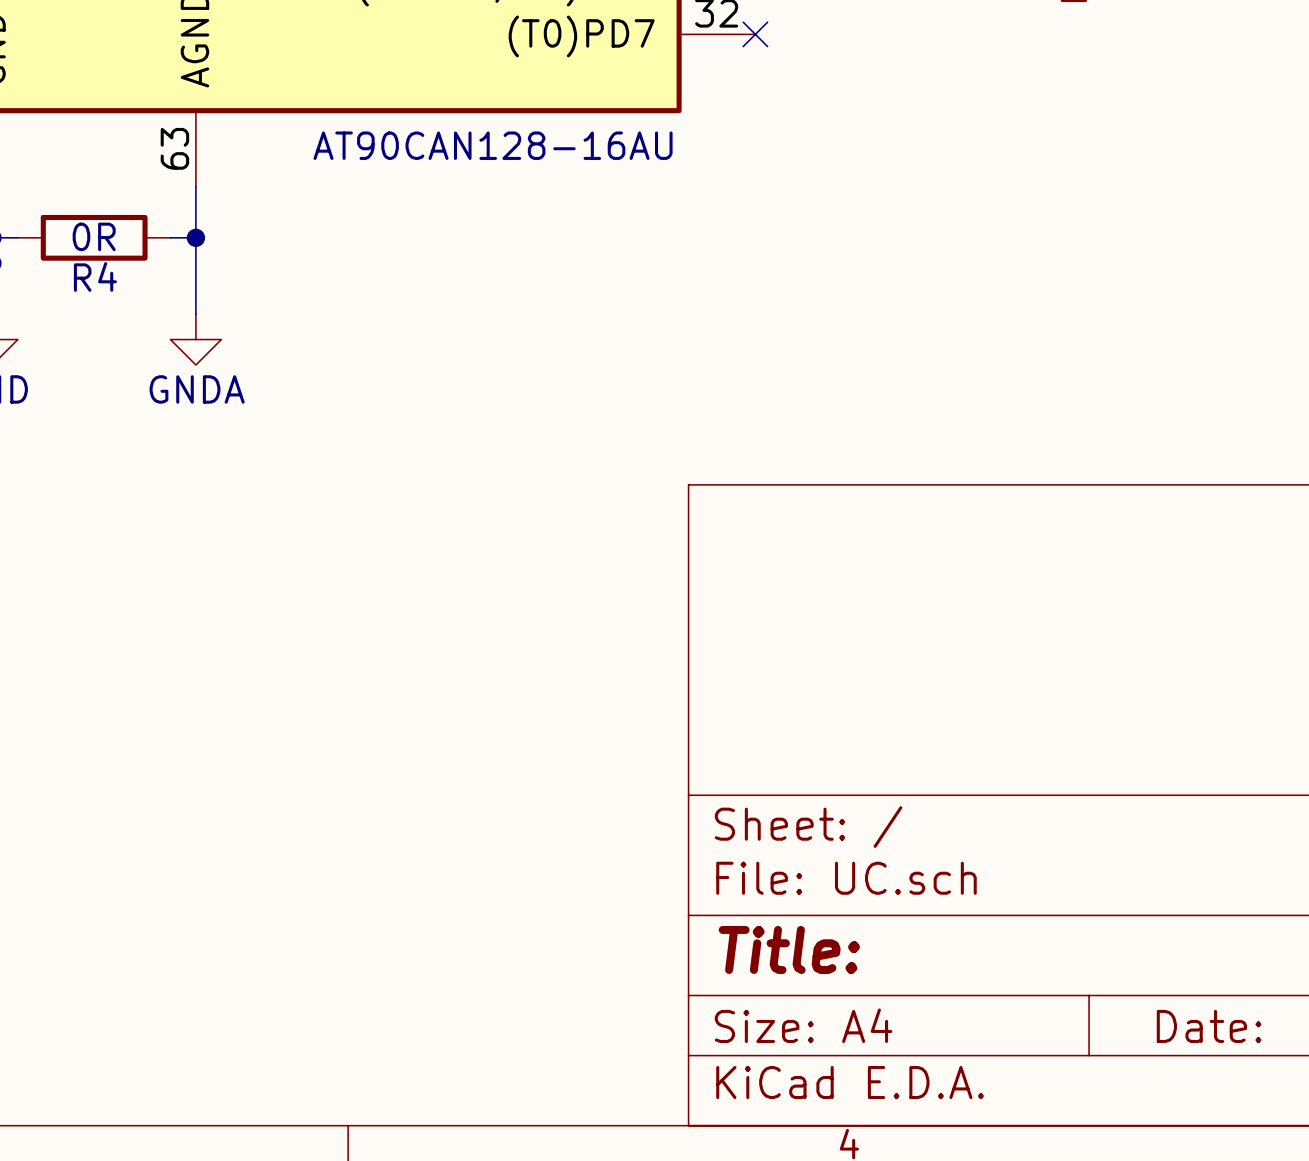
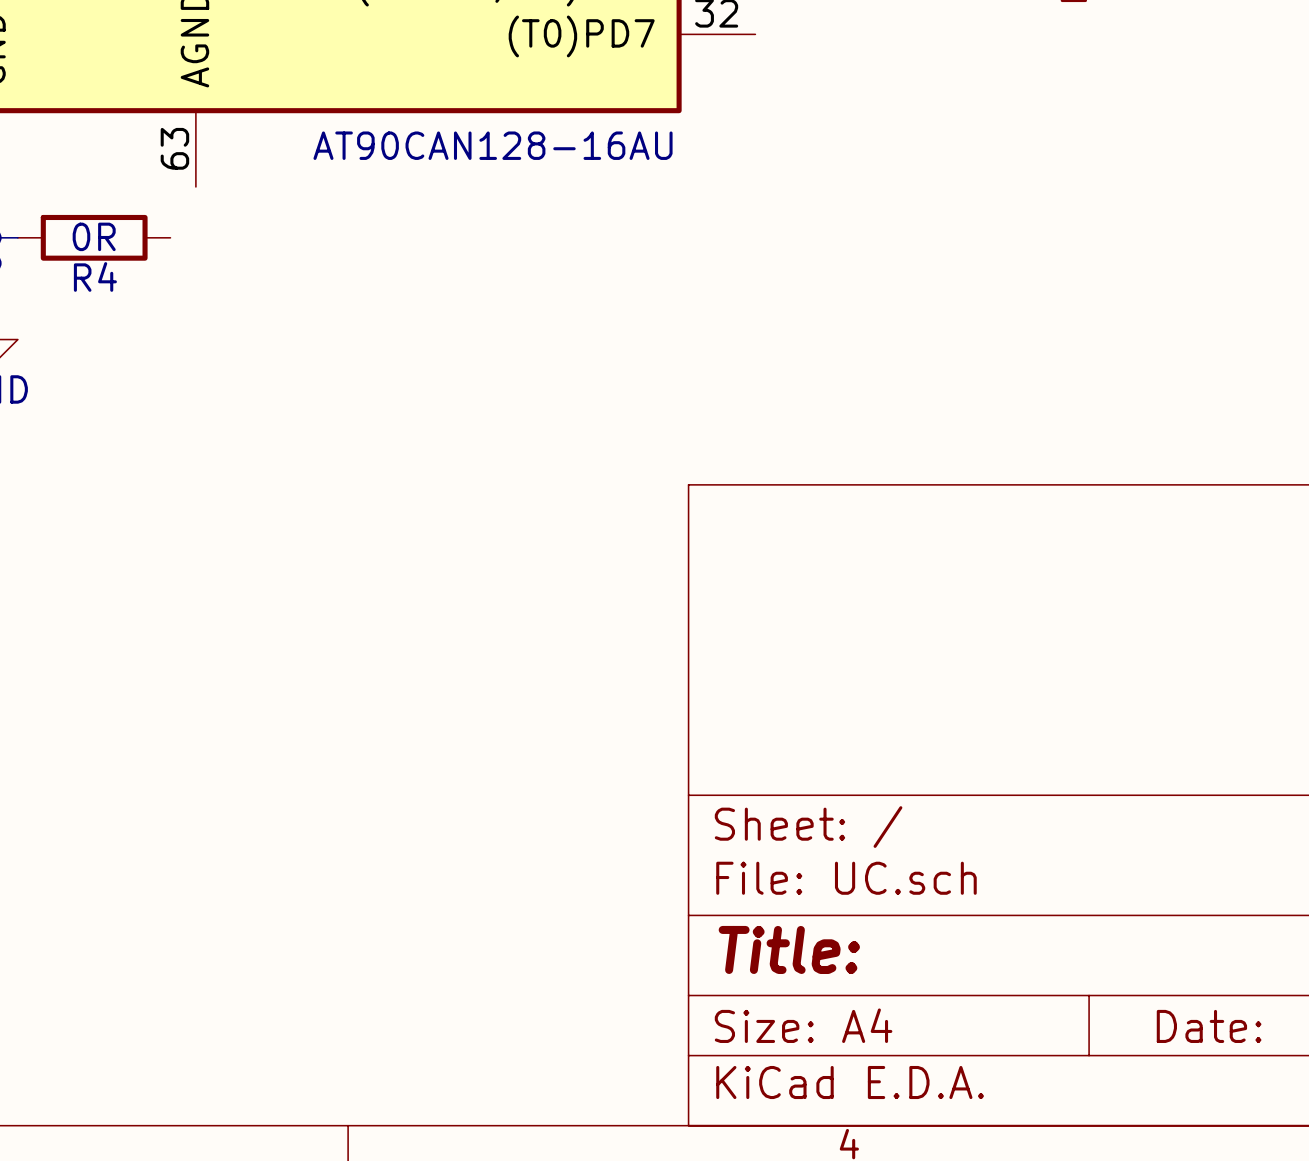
no-connect mark: (755, 34) -> none
wire: (195, 186) (195, 314) -> none
wire: (170, 237) (195, 237) -> none
junction: (195, 237) -> none
power symbol: GNDA (195, 339) -> none

